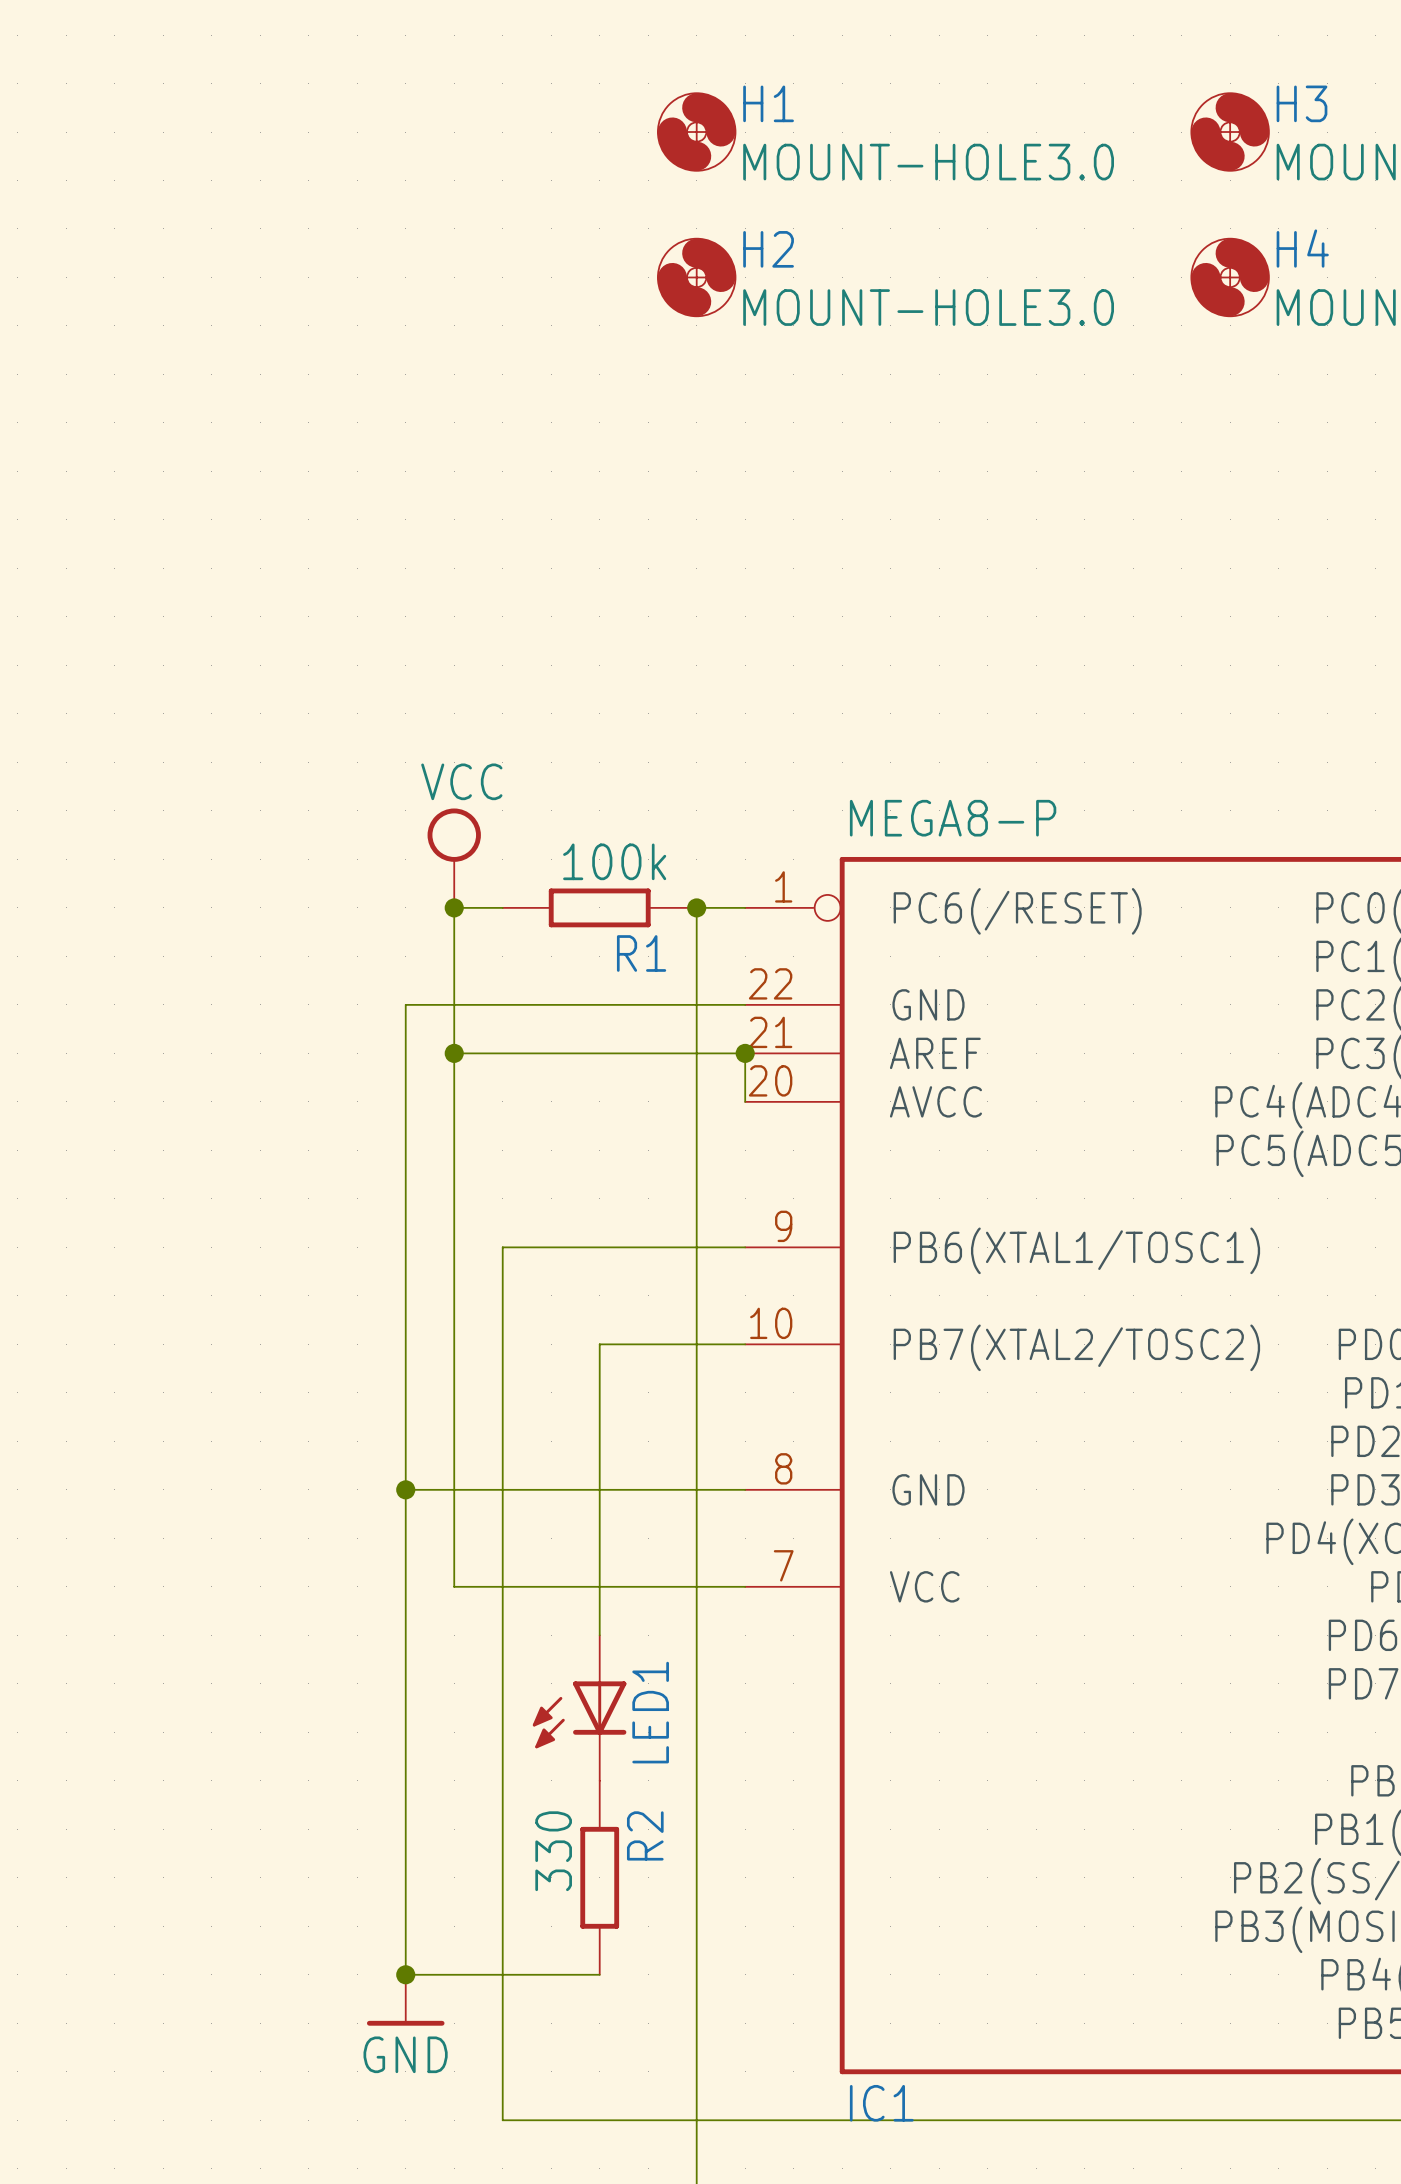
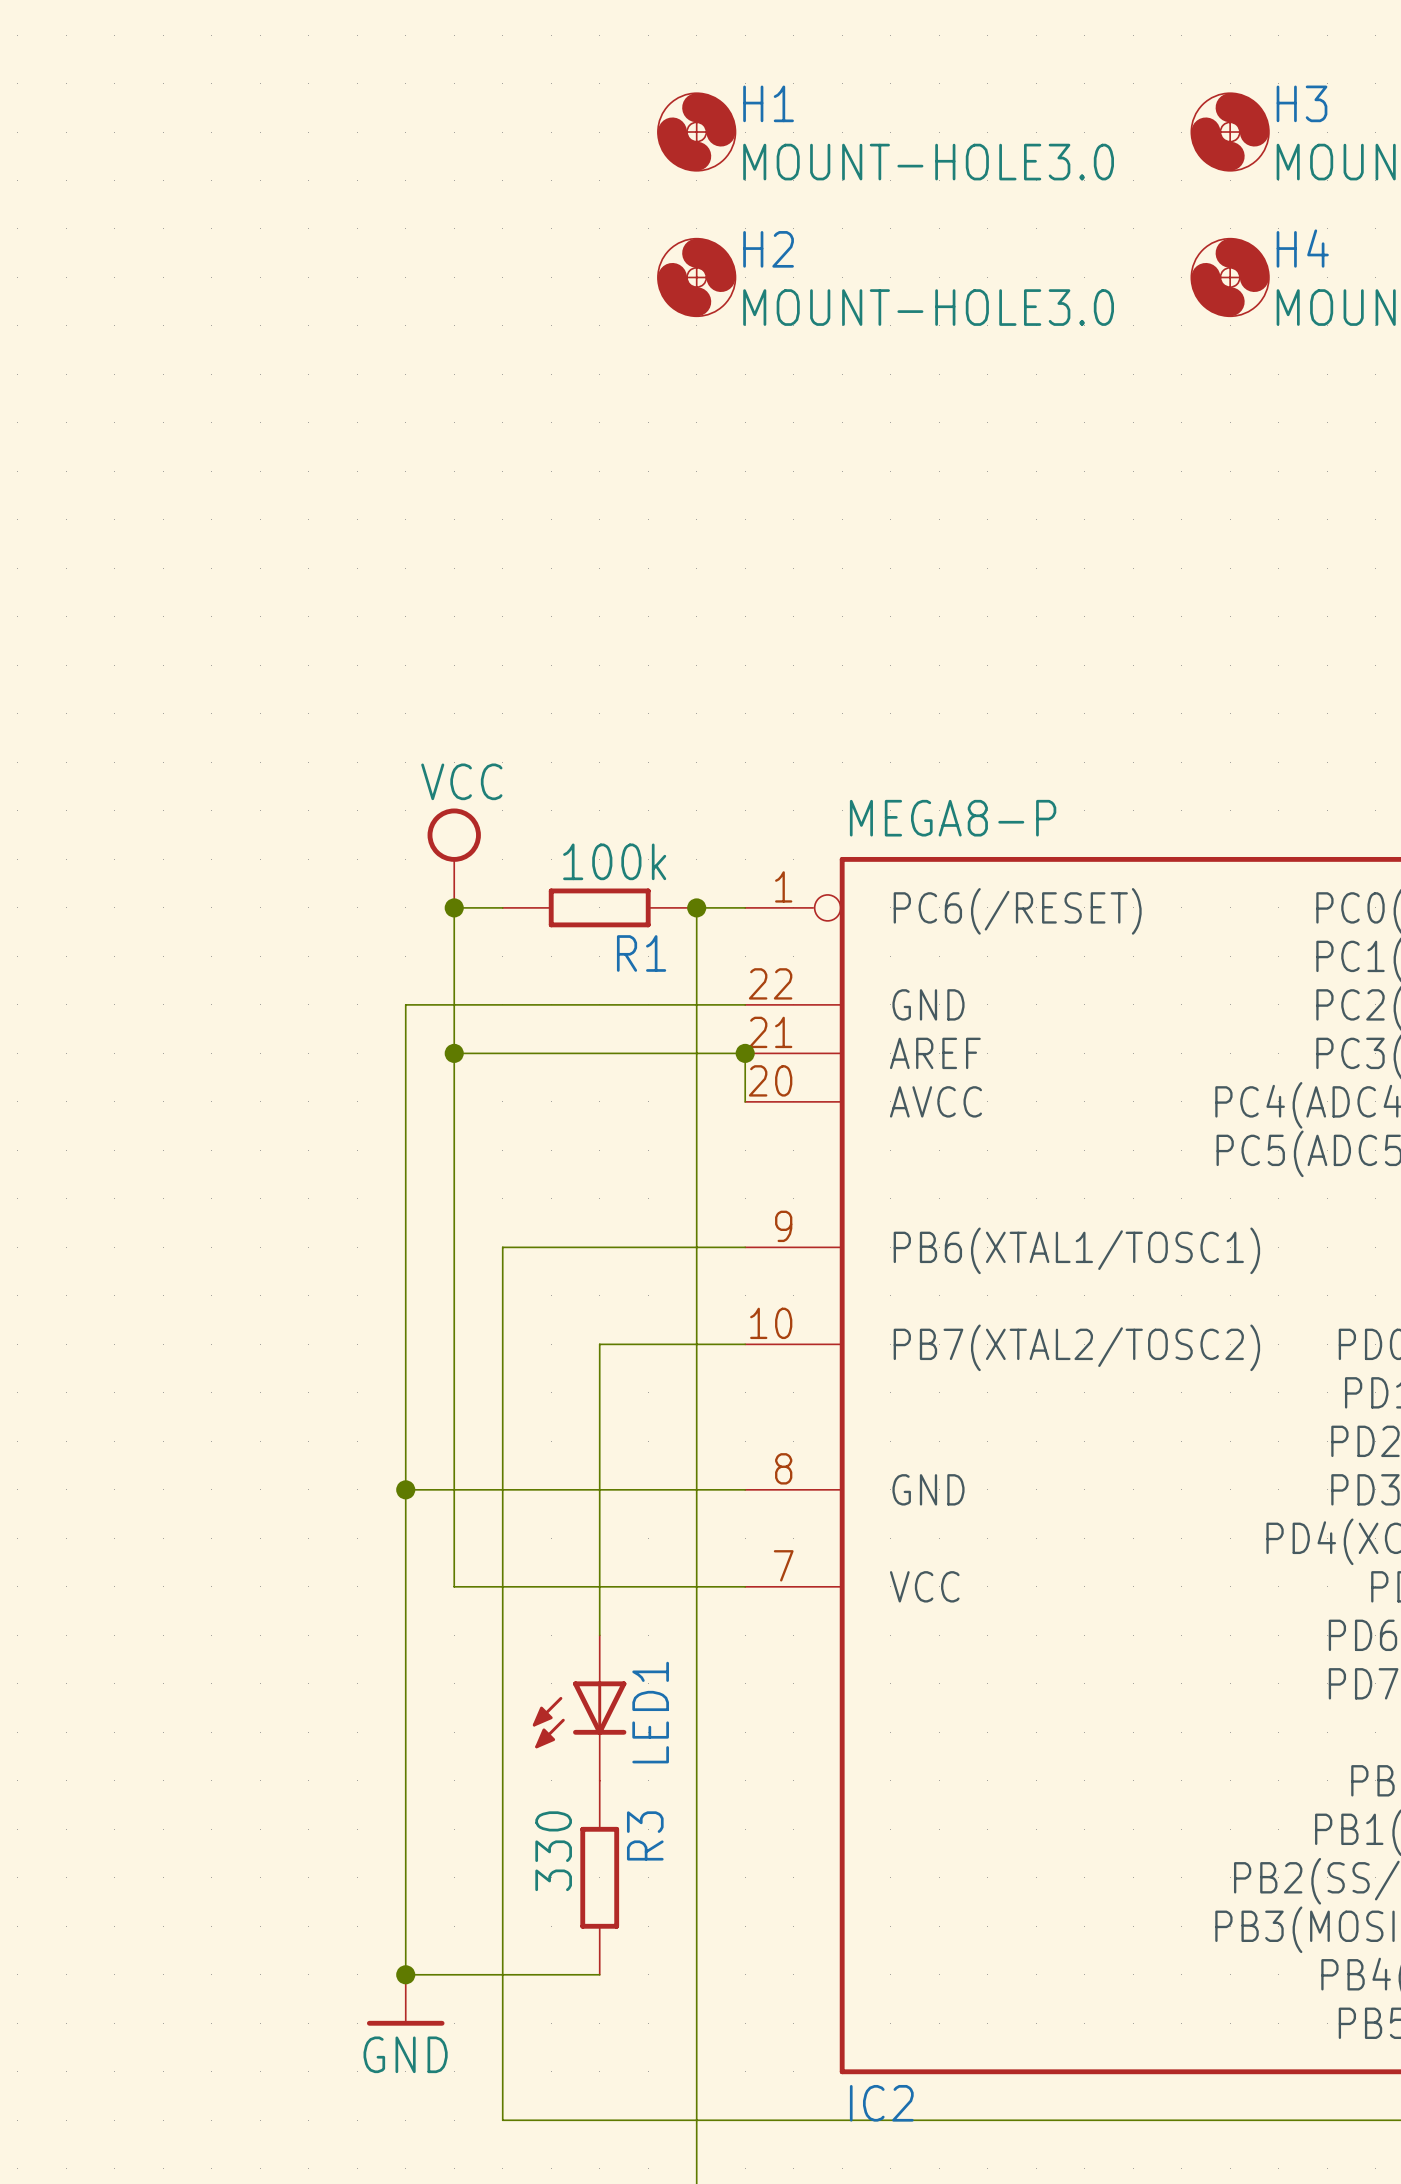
R2 name: R2 (645, 1835) -> R3 (645, 1835)
IC1 name: IC1 (881, 2103) -> IC2 (881, 2103)

